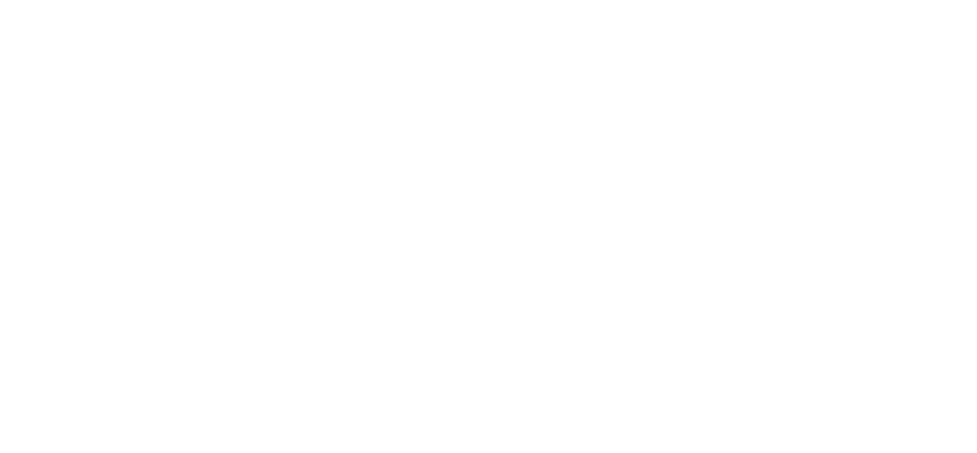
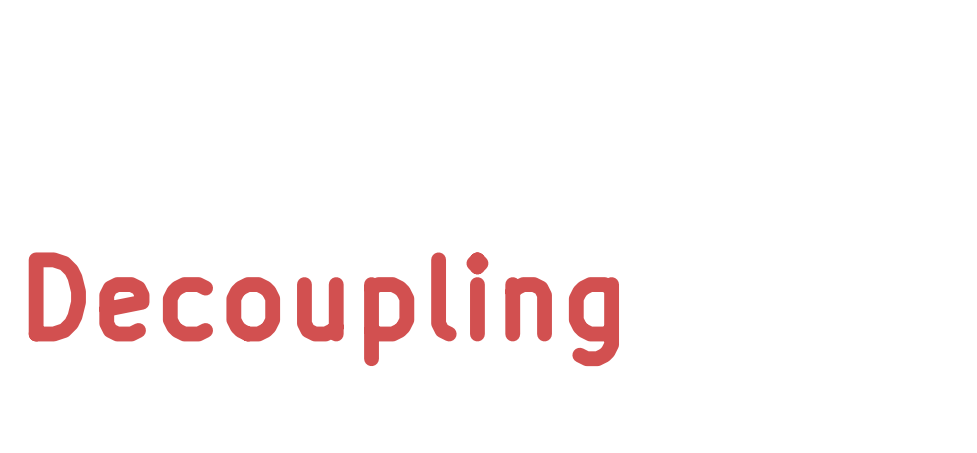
text: none -> Decoupling (323, 309)

